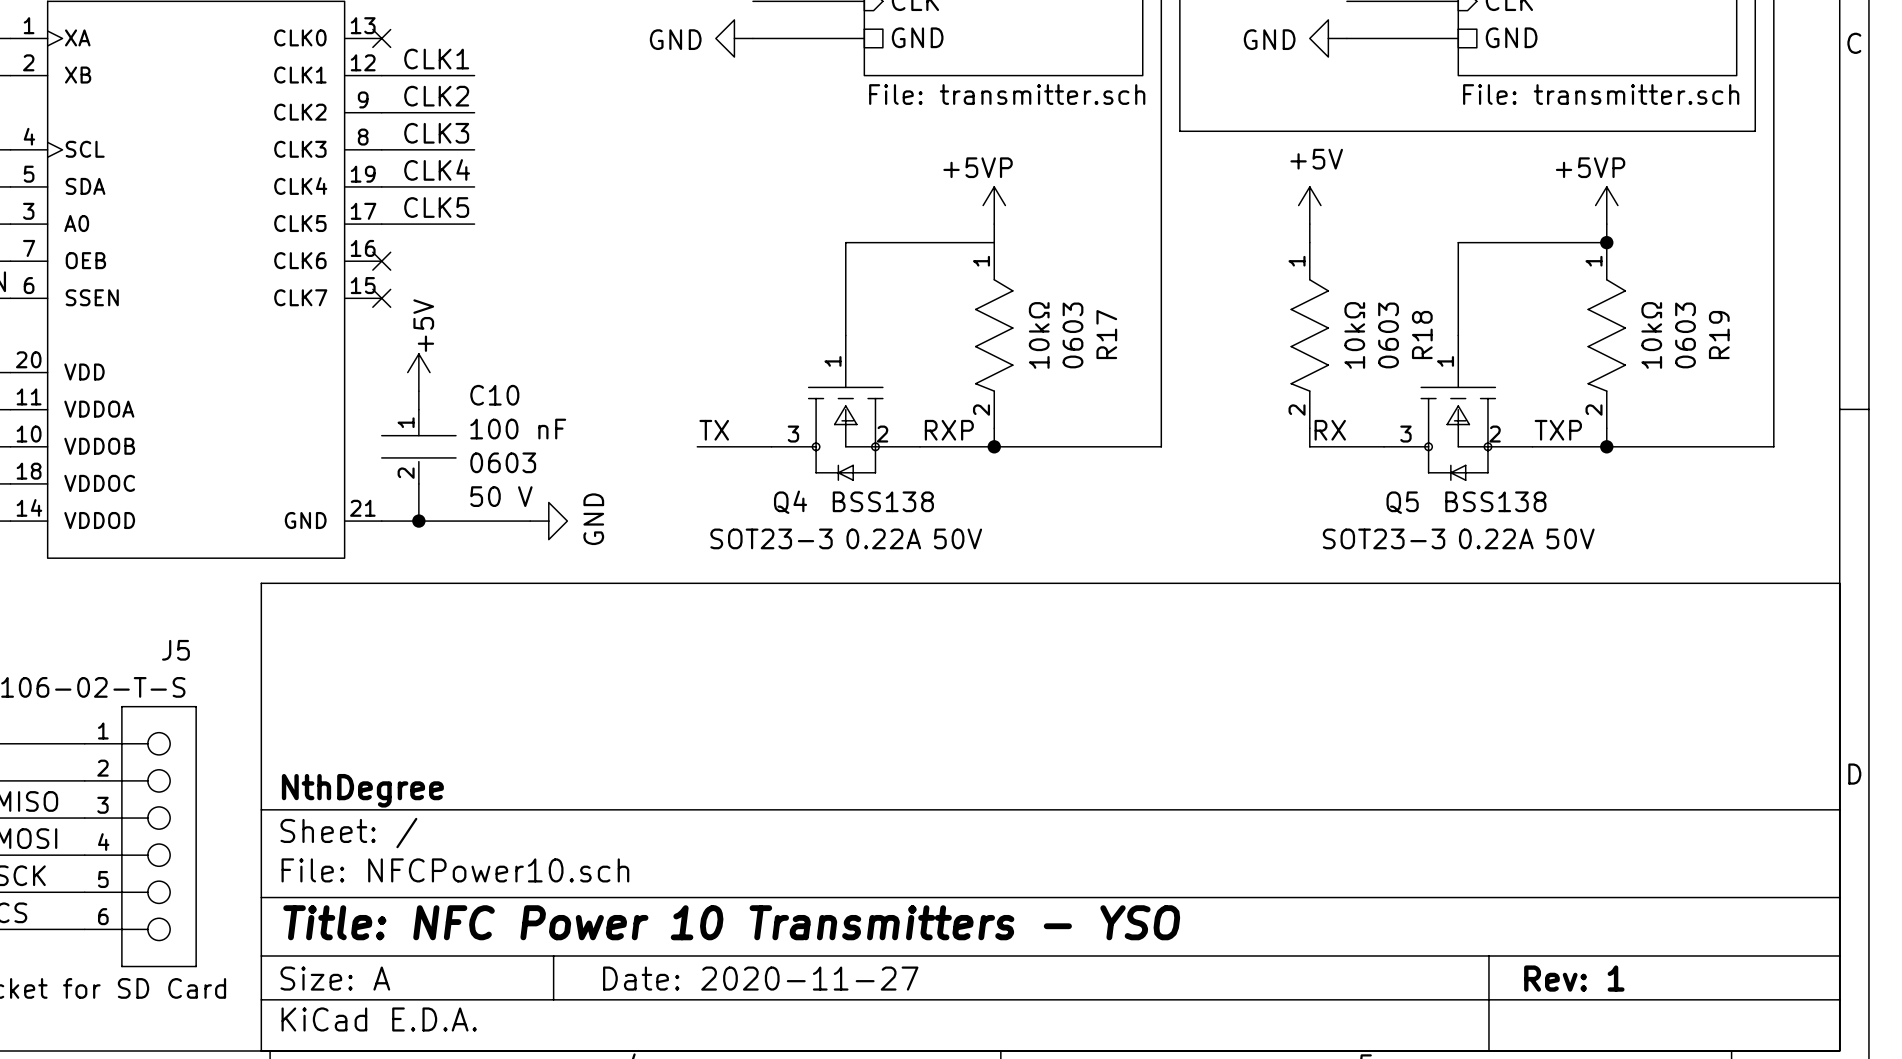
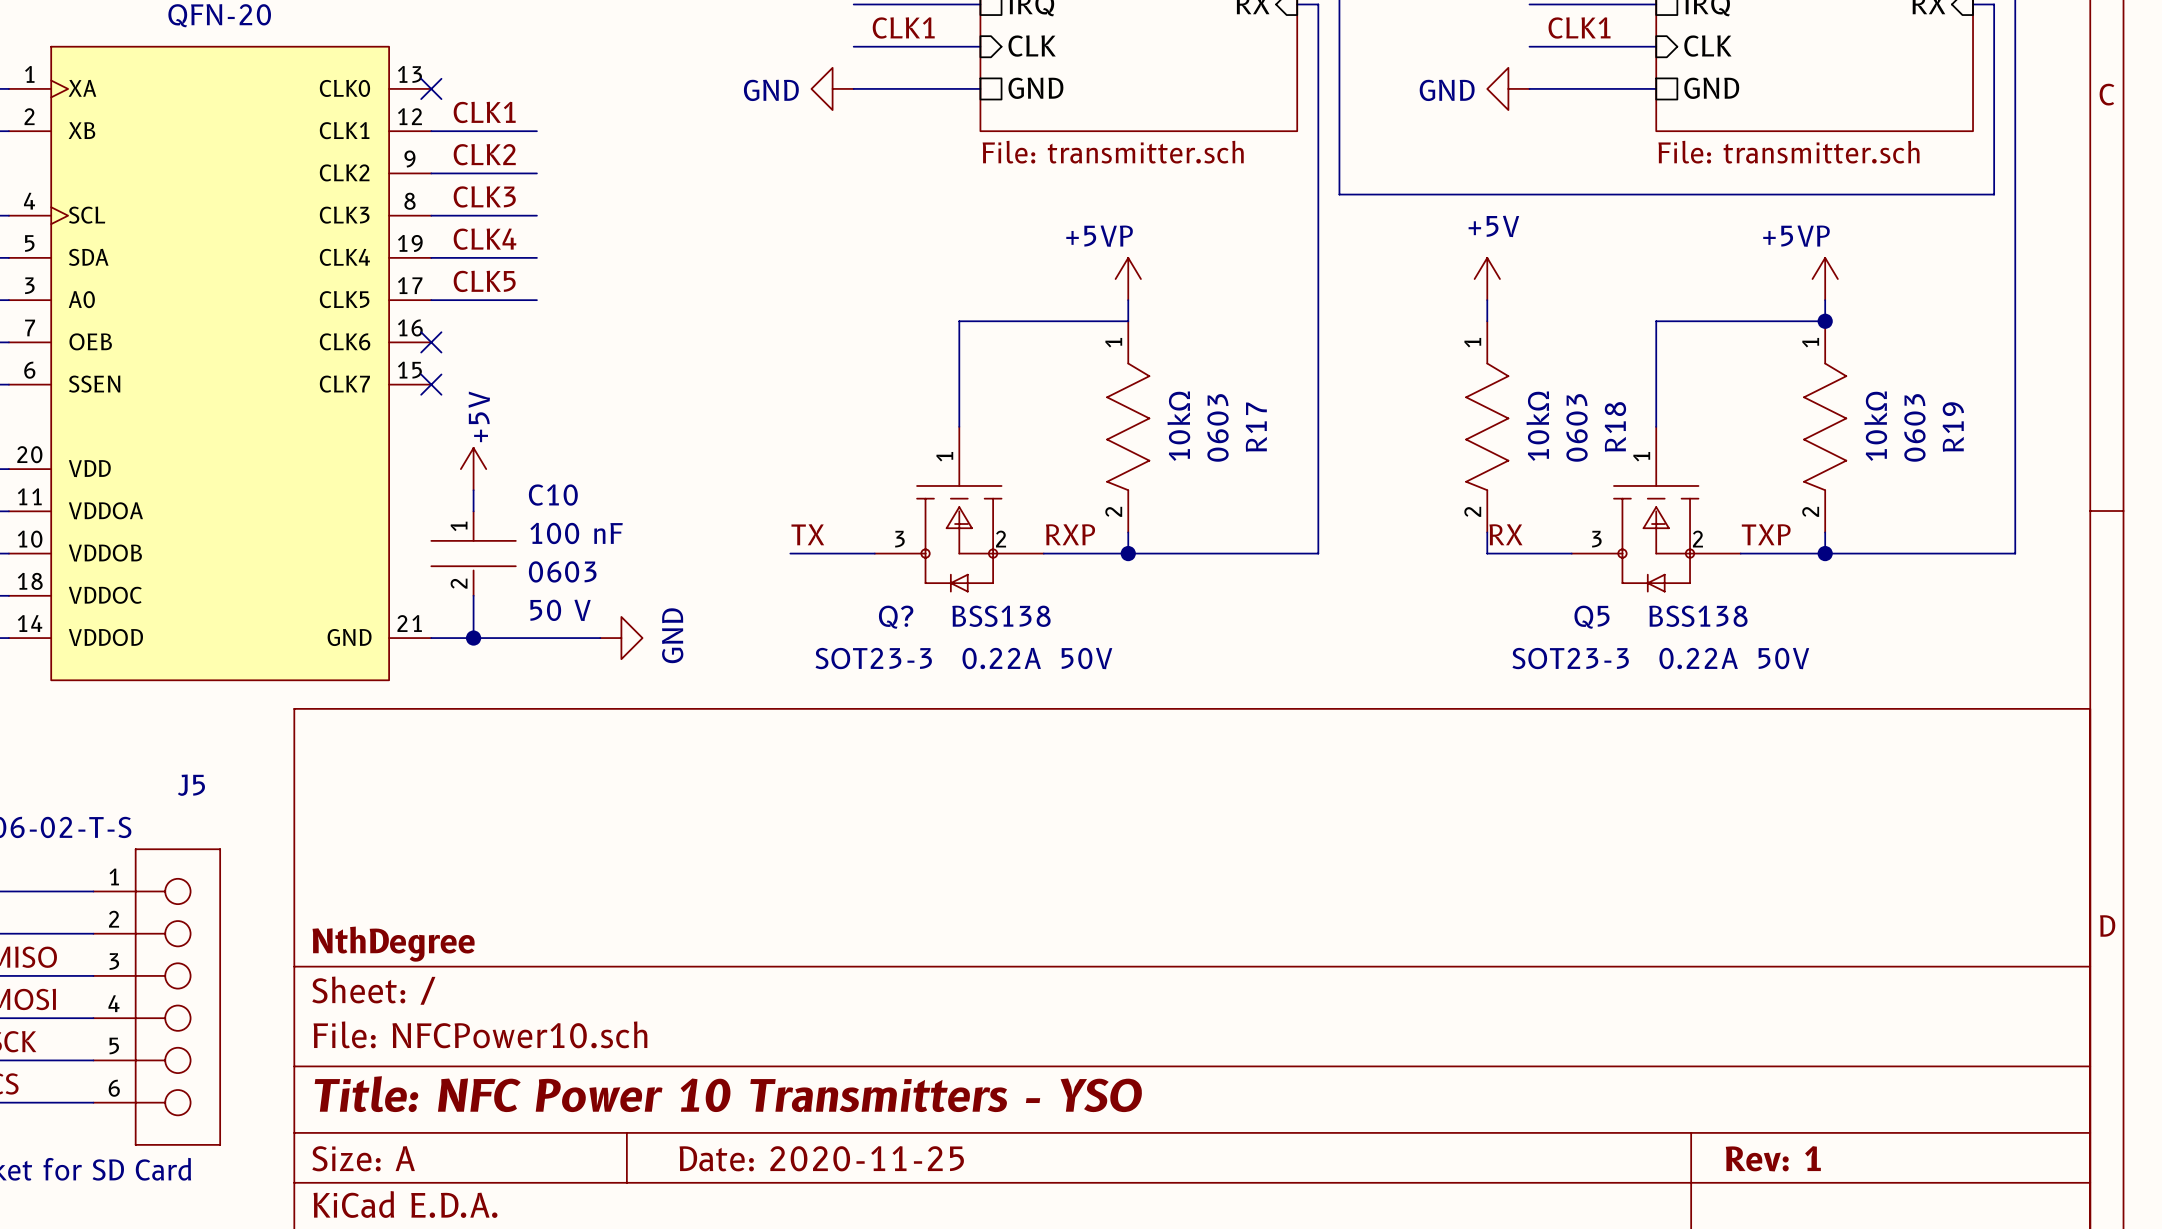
Q4 name: Q4 (790, 502) -> Q? (896, 617)
title block: Date: 2020-11-27 (760, 978) -> Date: 2020-11-25 (821, 1158)

